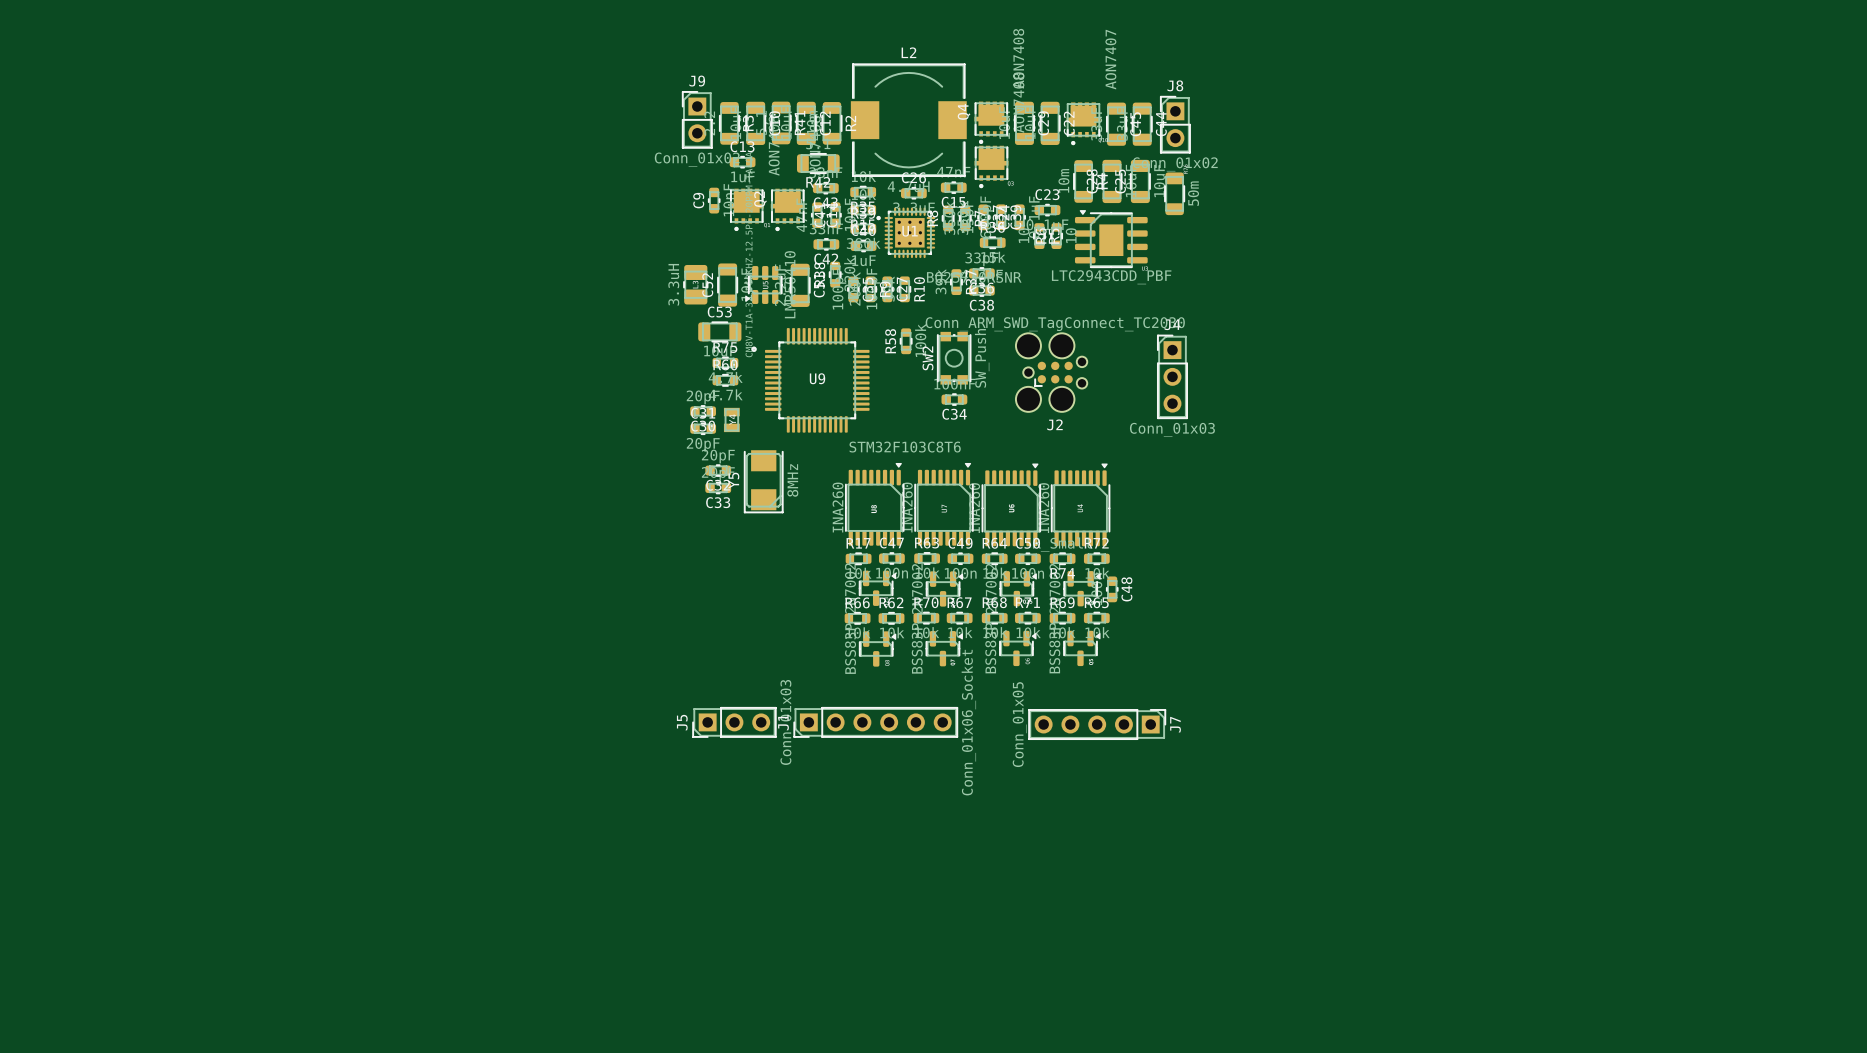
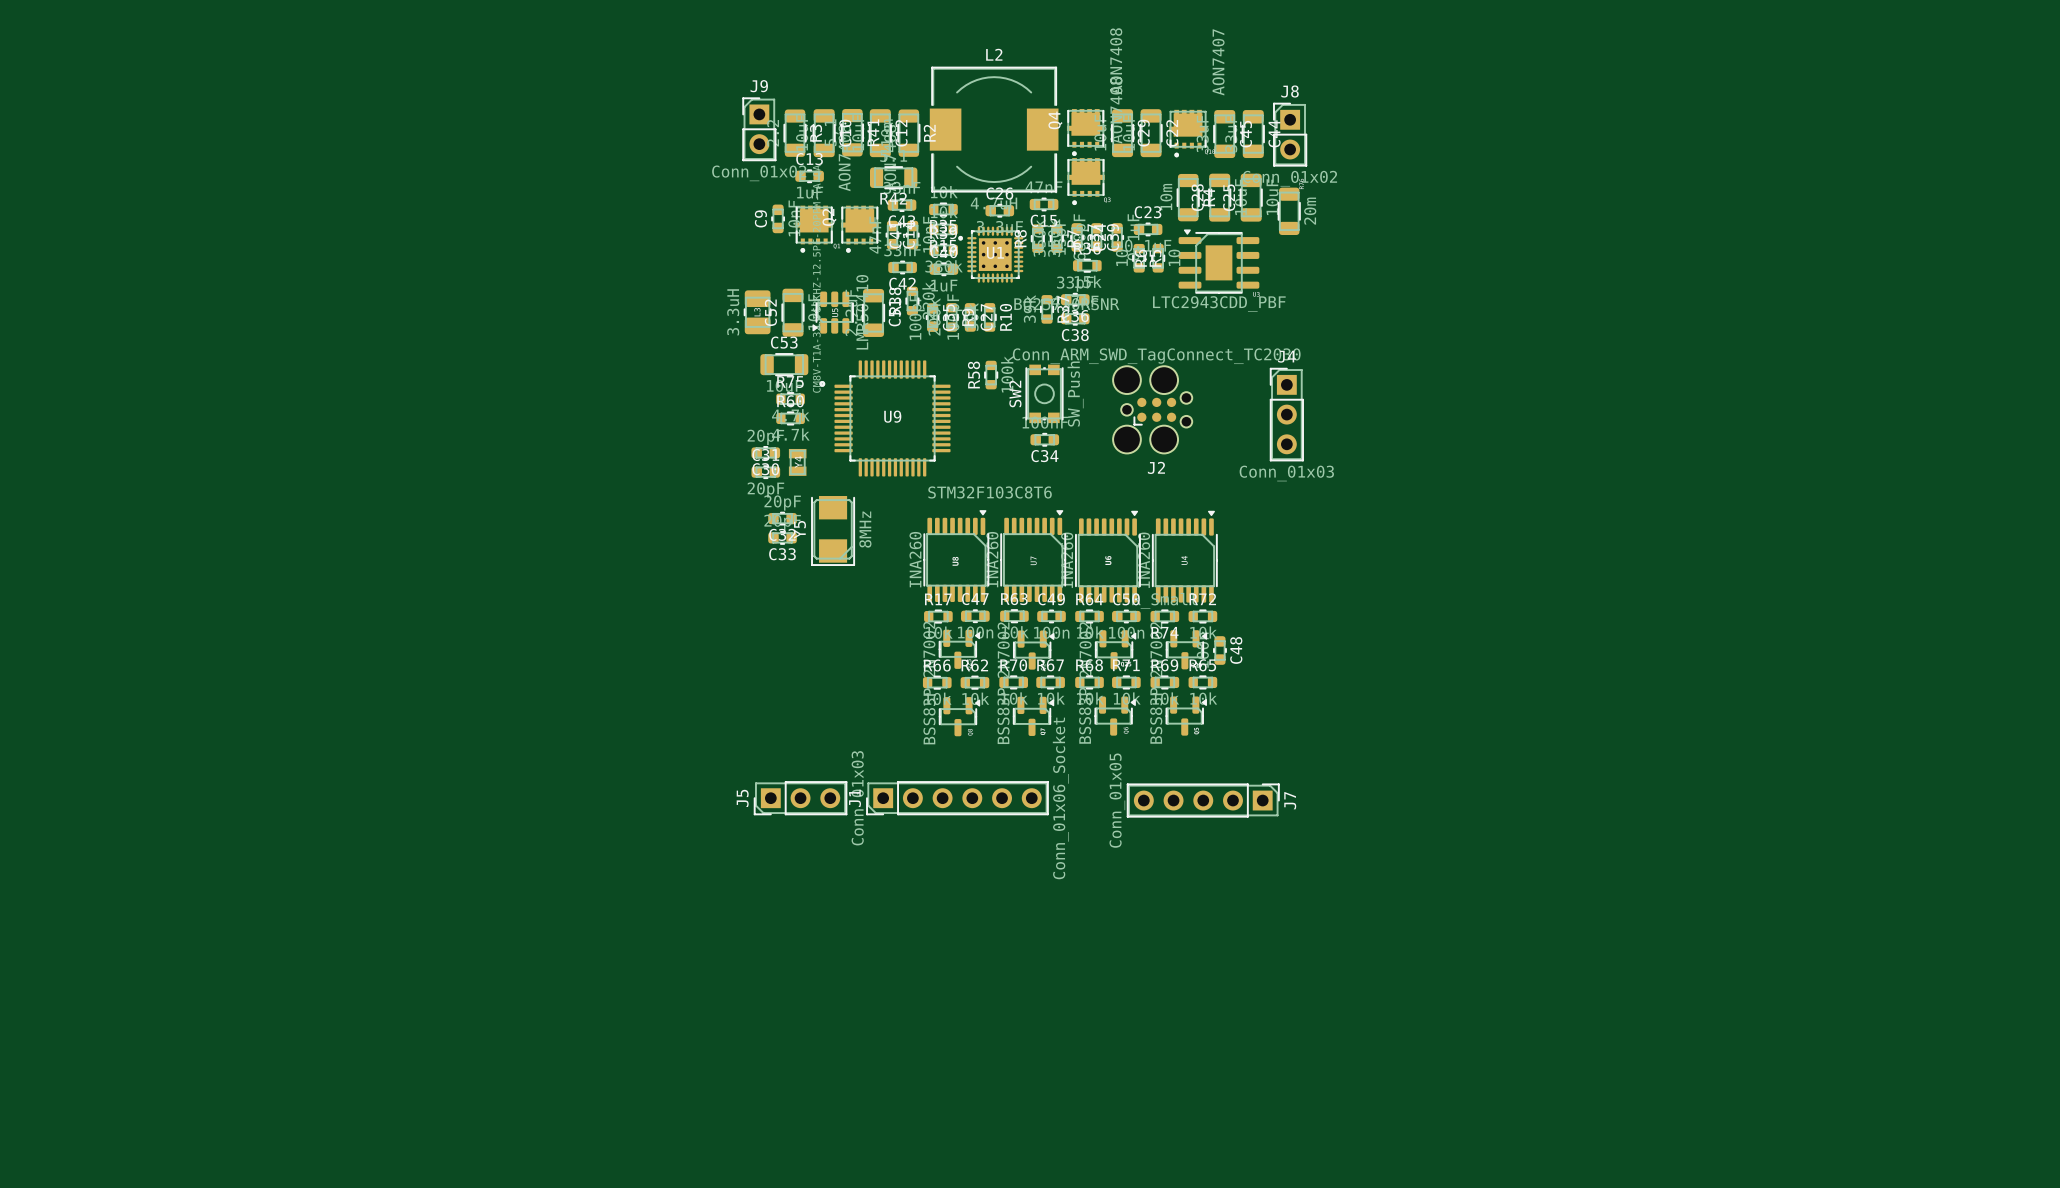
part value: 50m (1193, 193) -> 20m (1310, 211)

